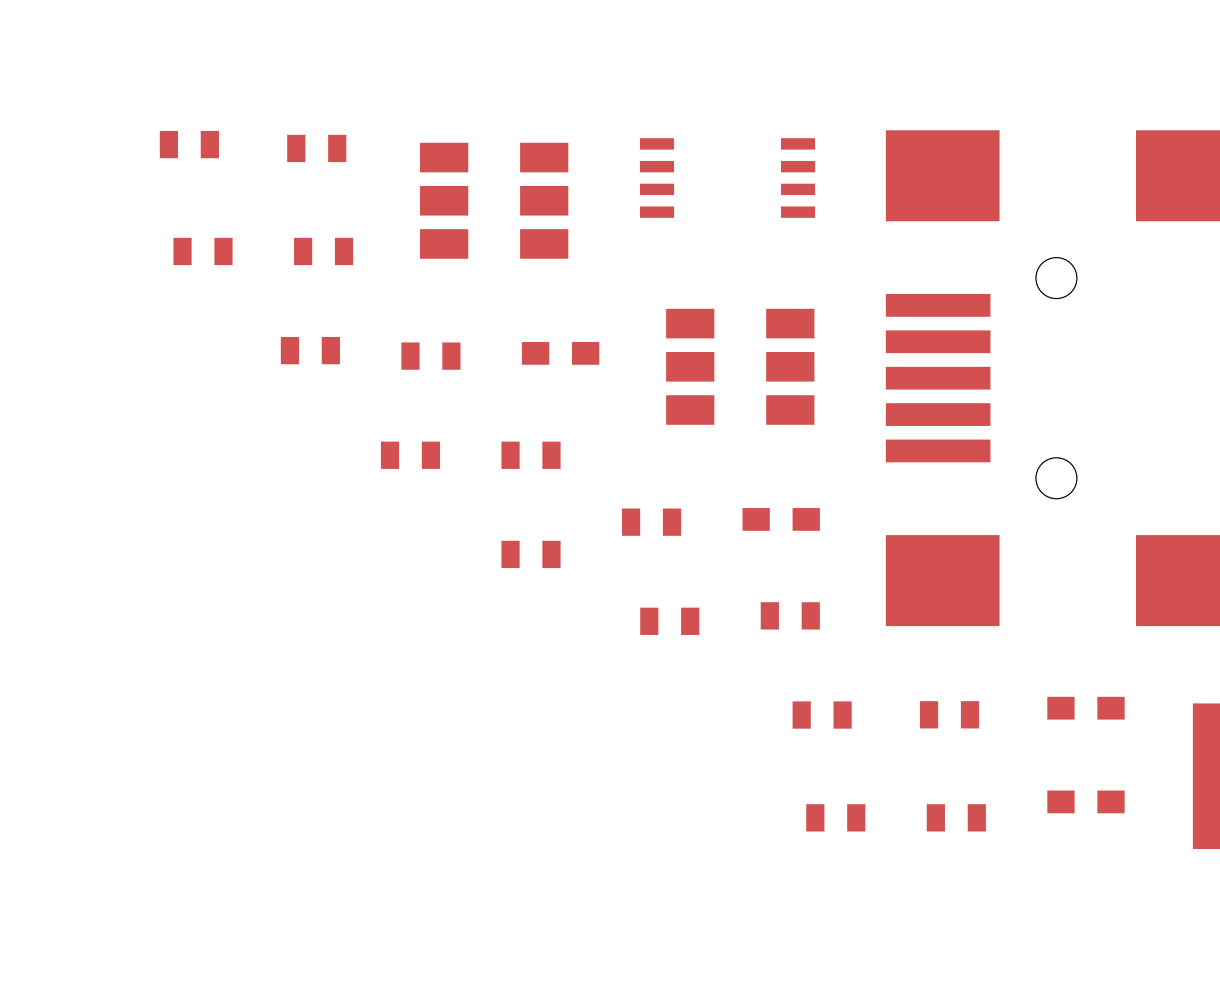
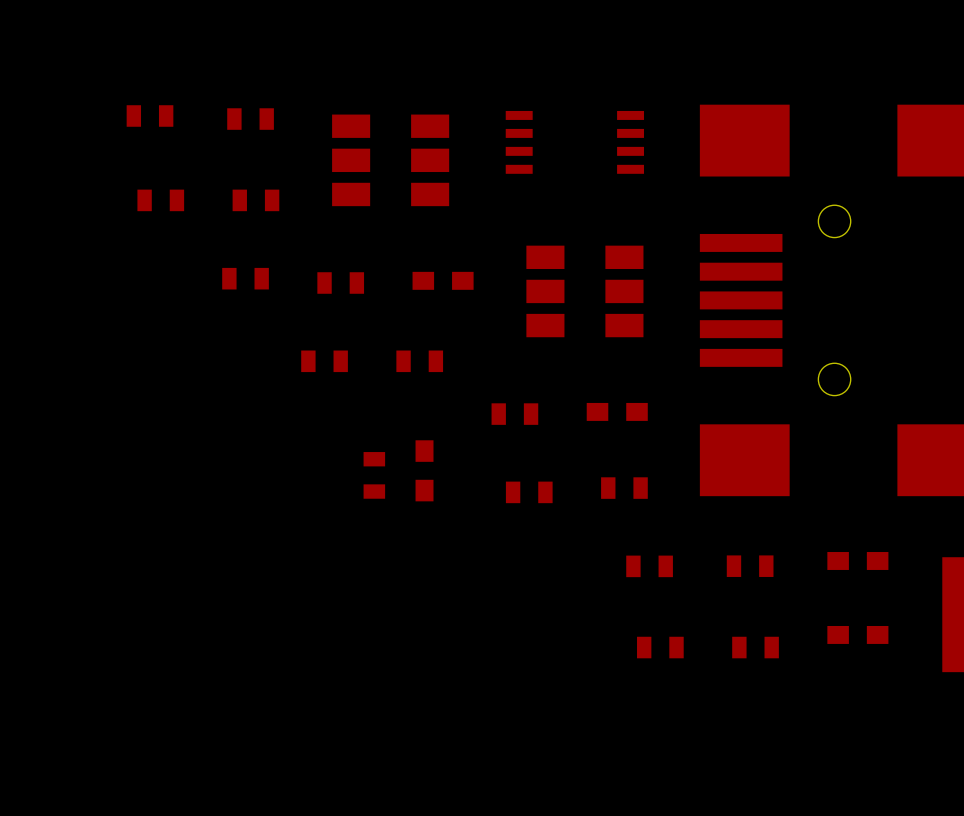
part rotation: 0° (531, 554) -> 90° clockwise (374, 475)
part position: (531, 554) -> (374, 475)
part: none -> (424, 470)

